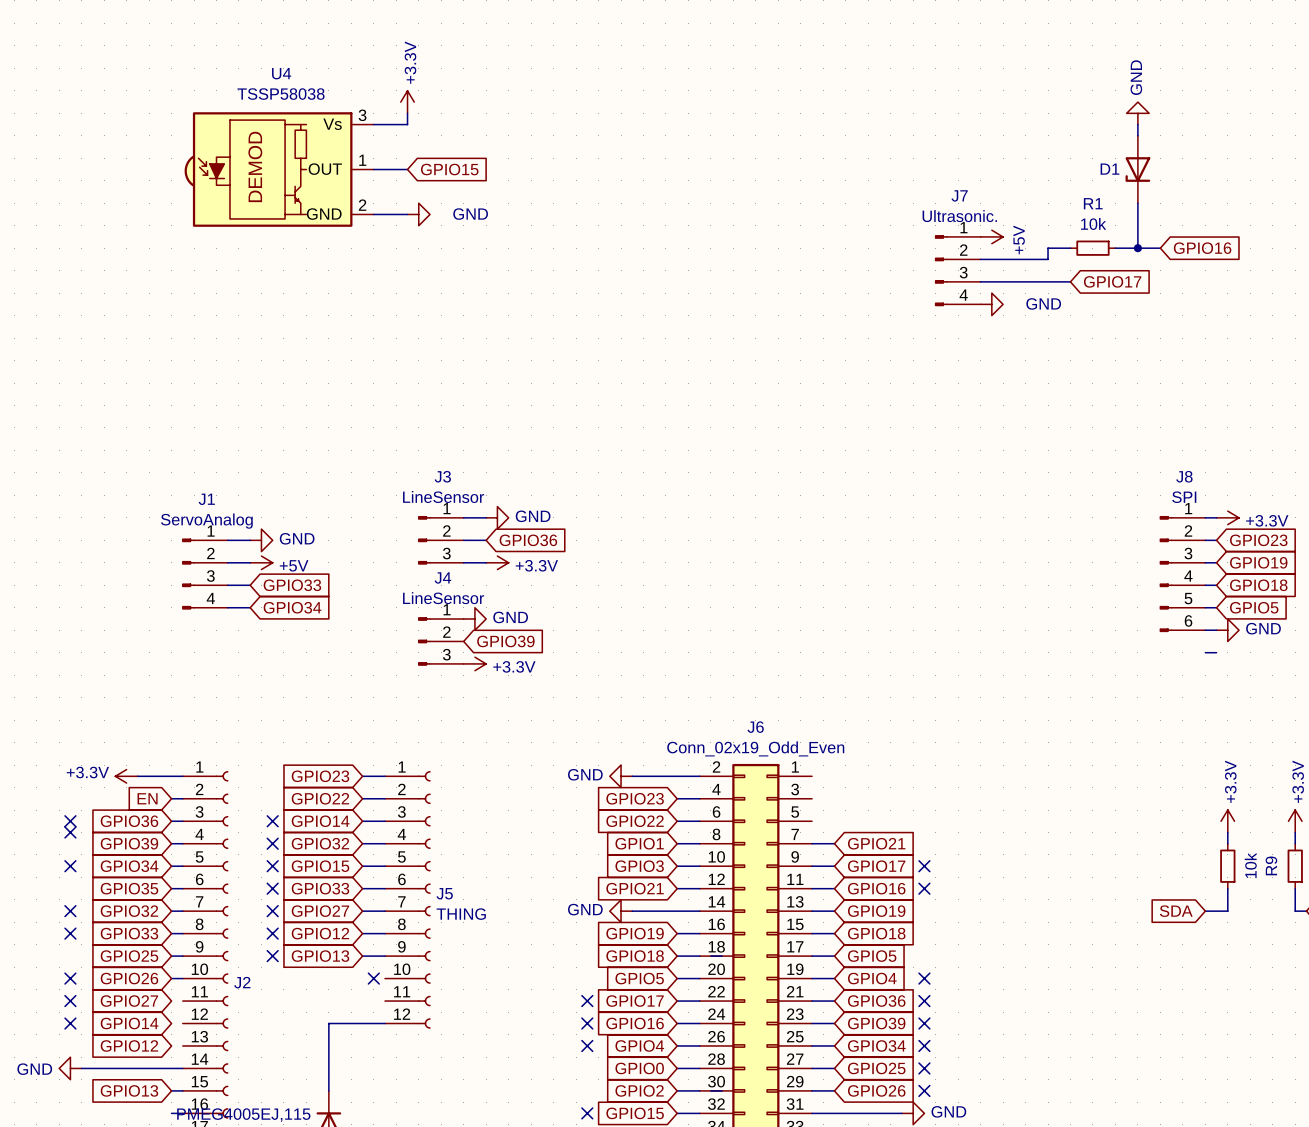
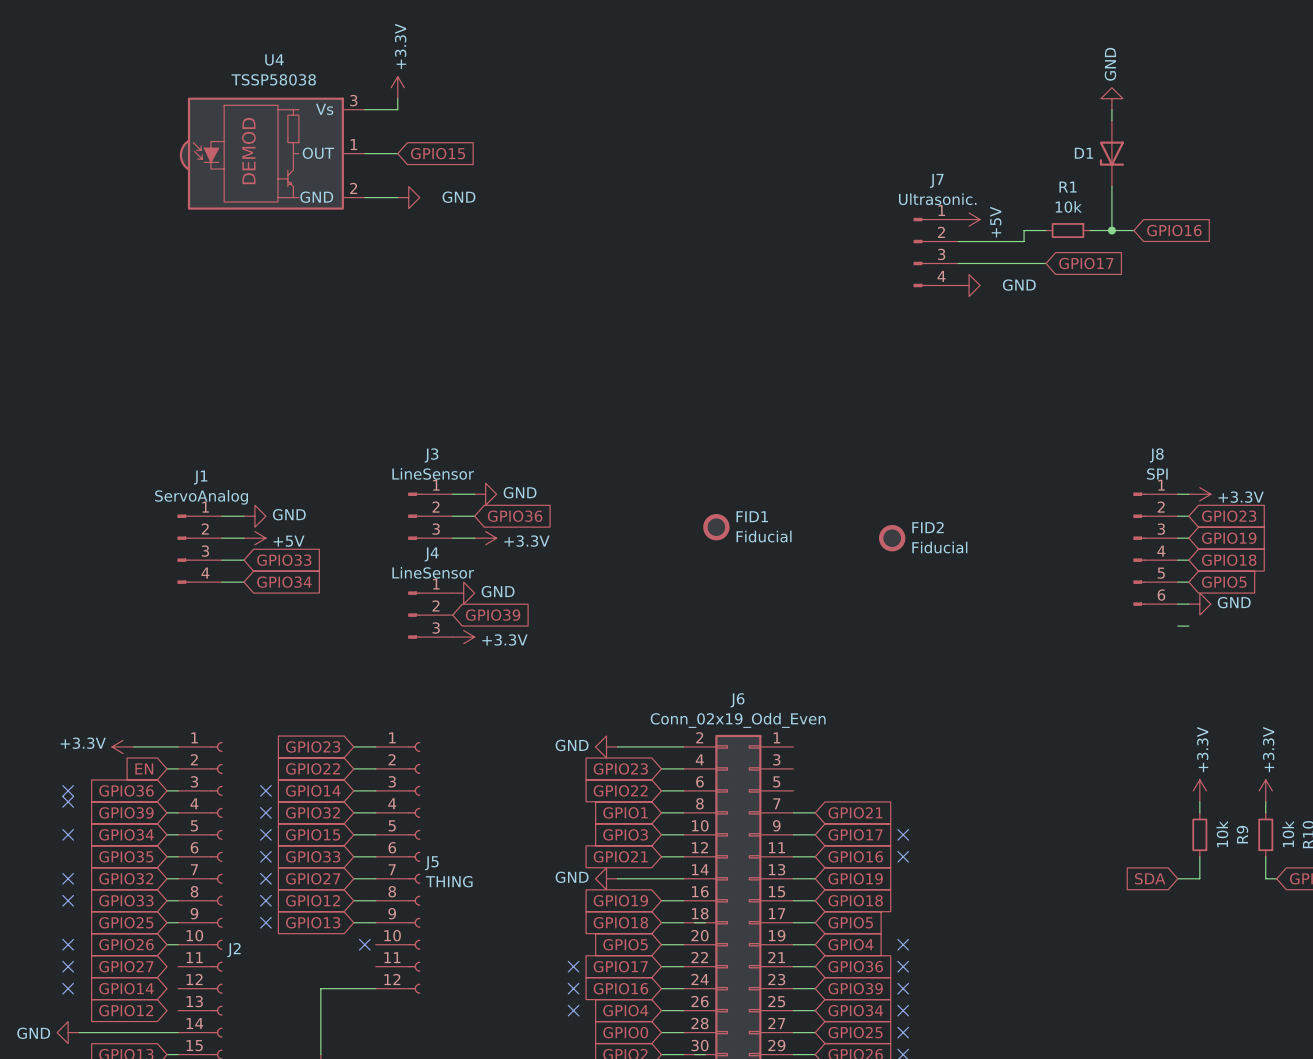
FID1: none -> Fiducial (716, 527)
FID2: none -> Fiducial (892, 538)

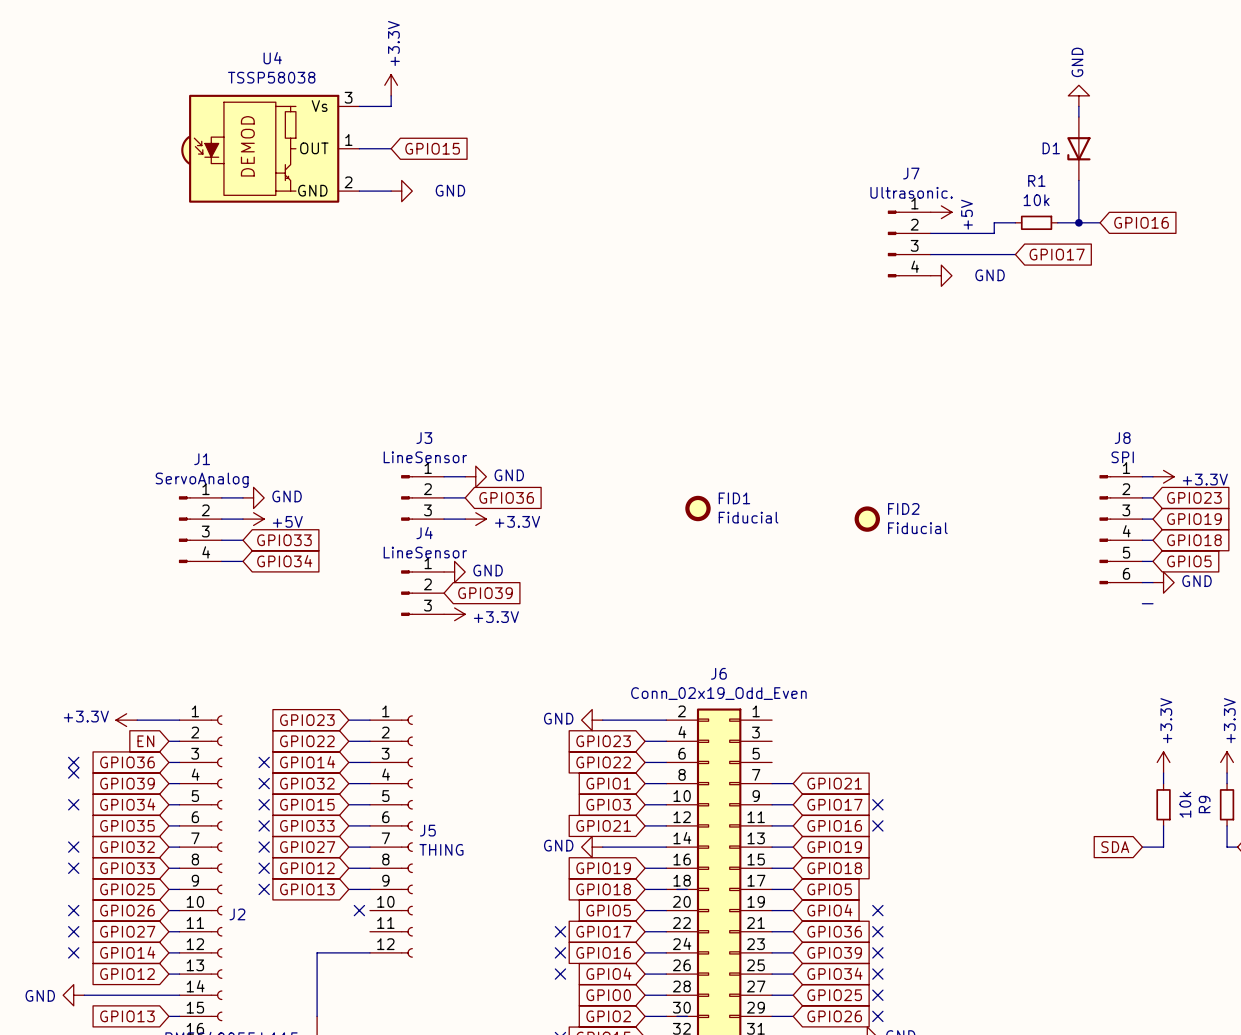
wire: none -> (168, 931) (179, 931)
wire: none -> (168, 952) (179, 952)
wire: none -> (168, 974) (179, 974)

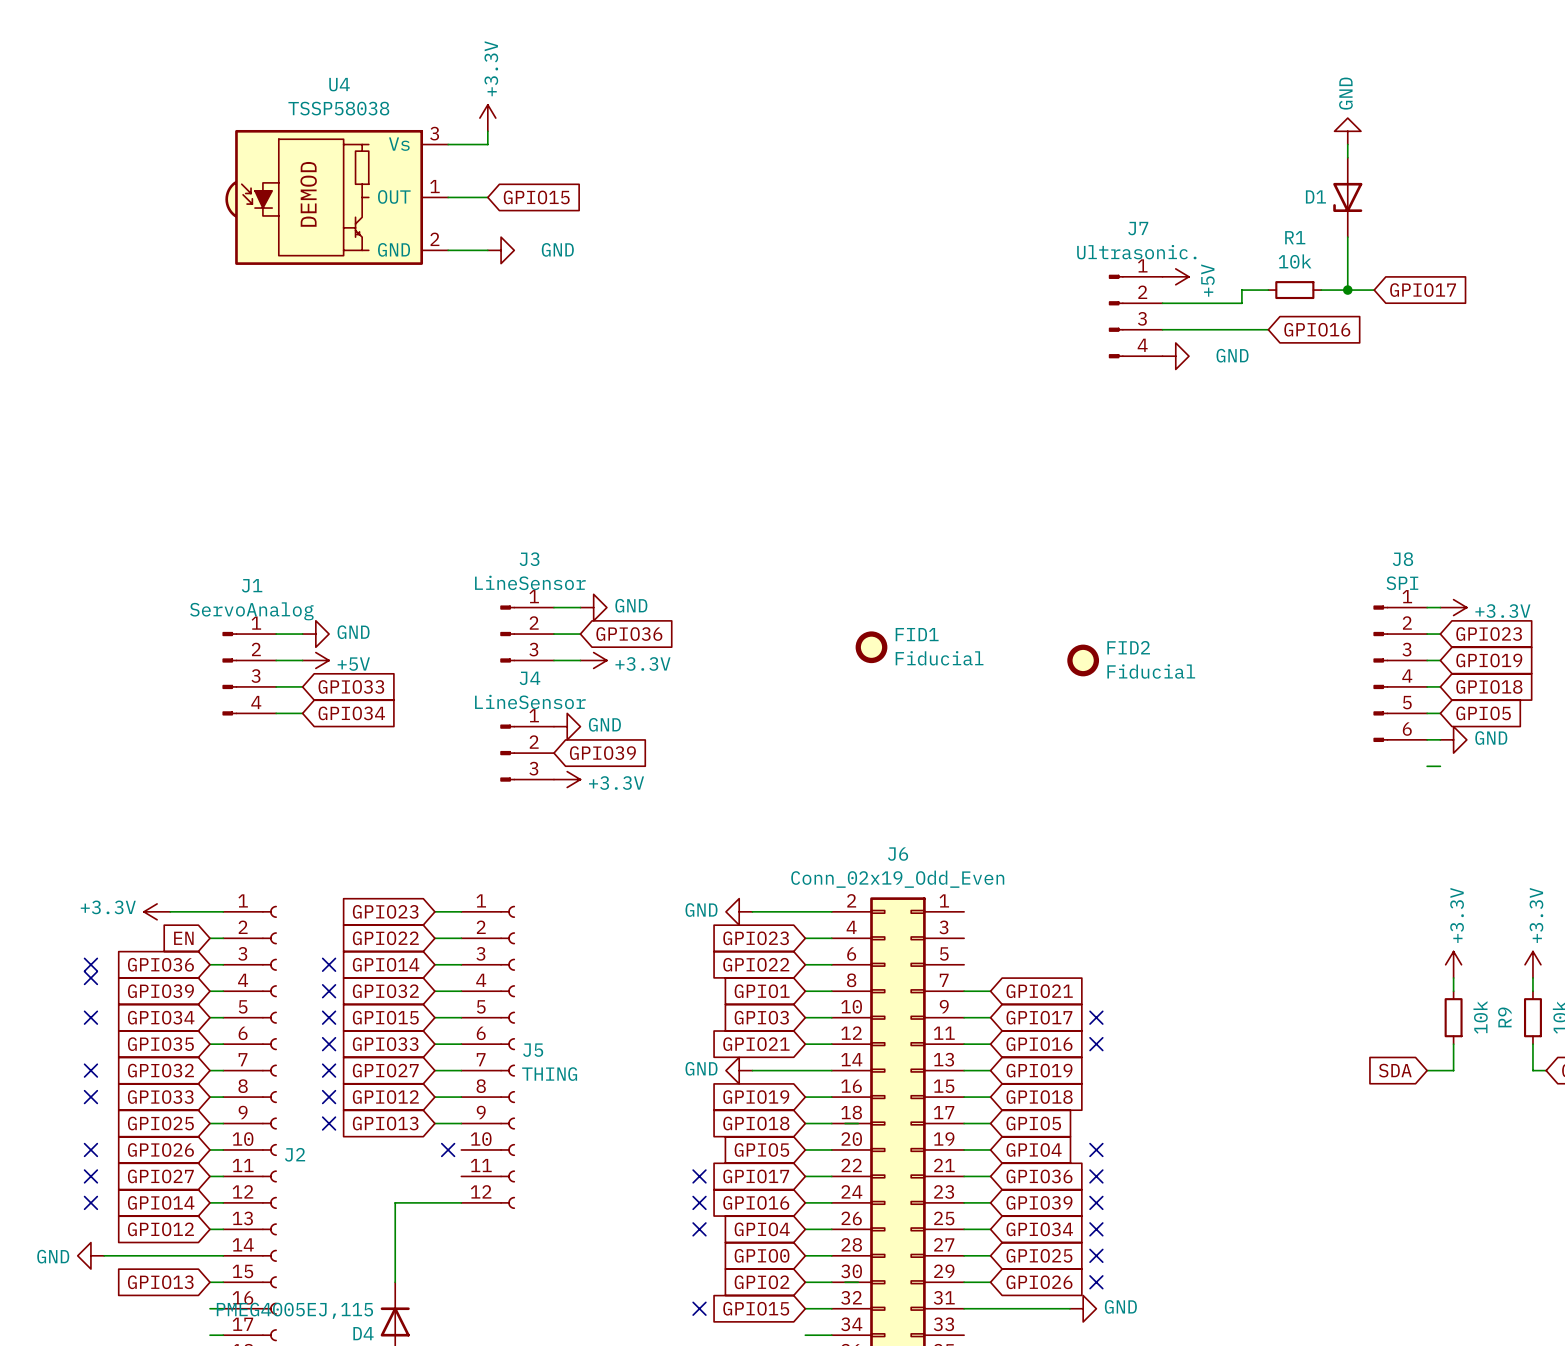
global label: GPIO16 (1141, 222) -> GPIO17 (1423, 290)
global label: GPIO17 (1057, 254) -> GPIO16 (1317, 329)

